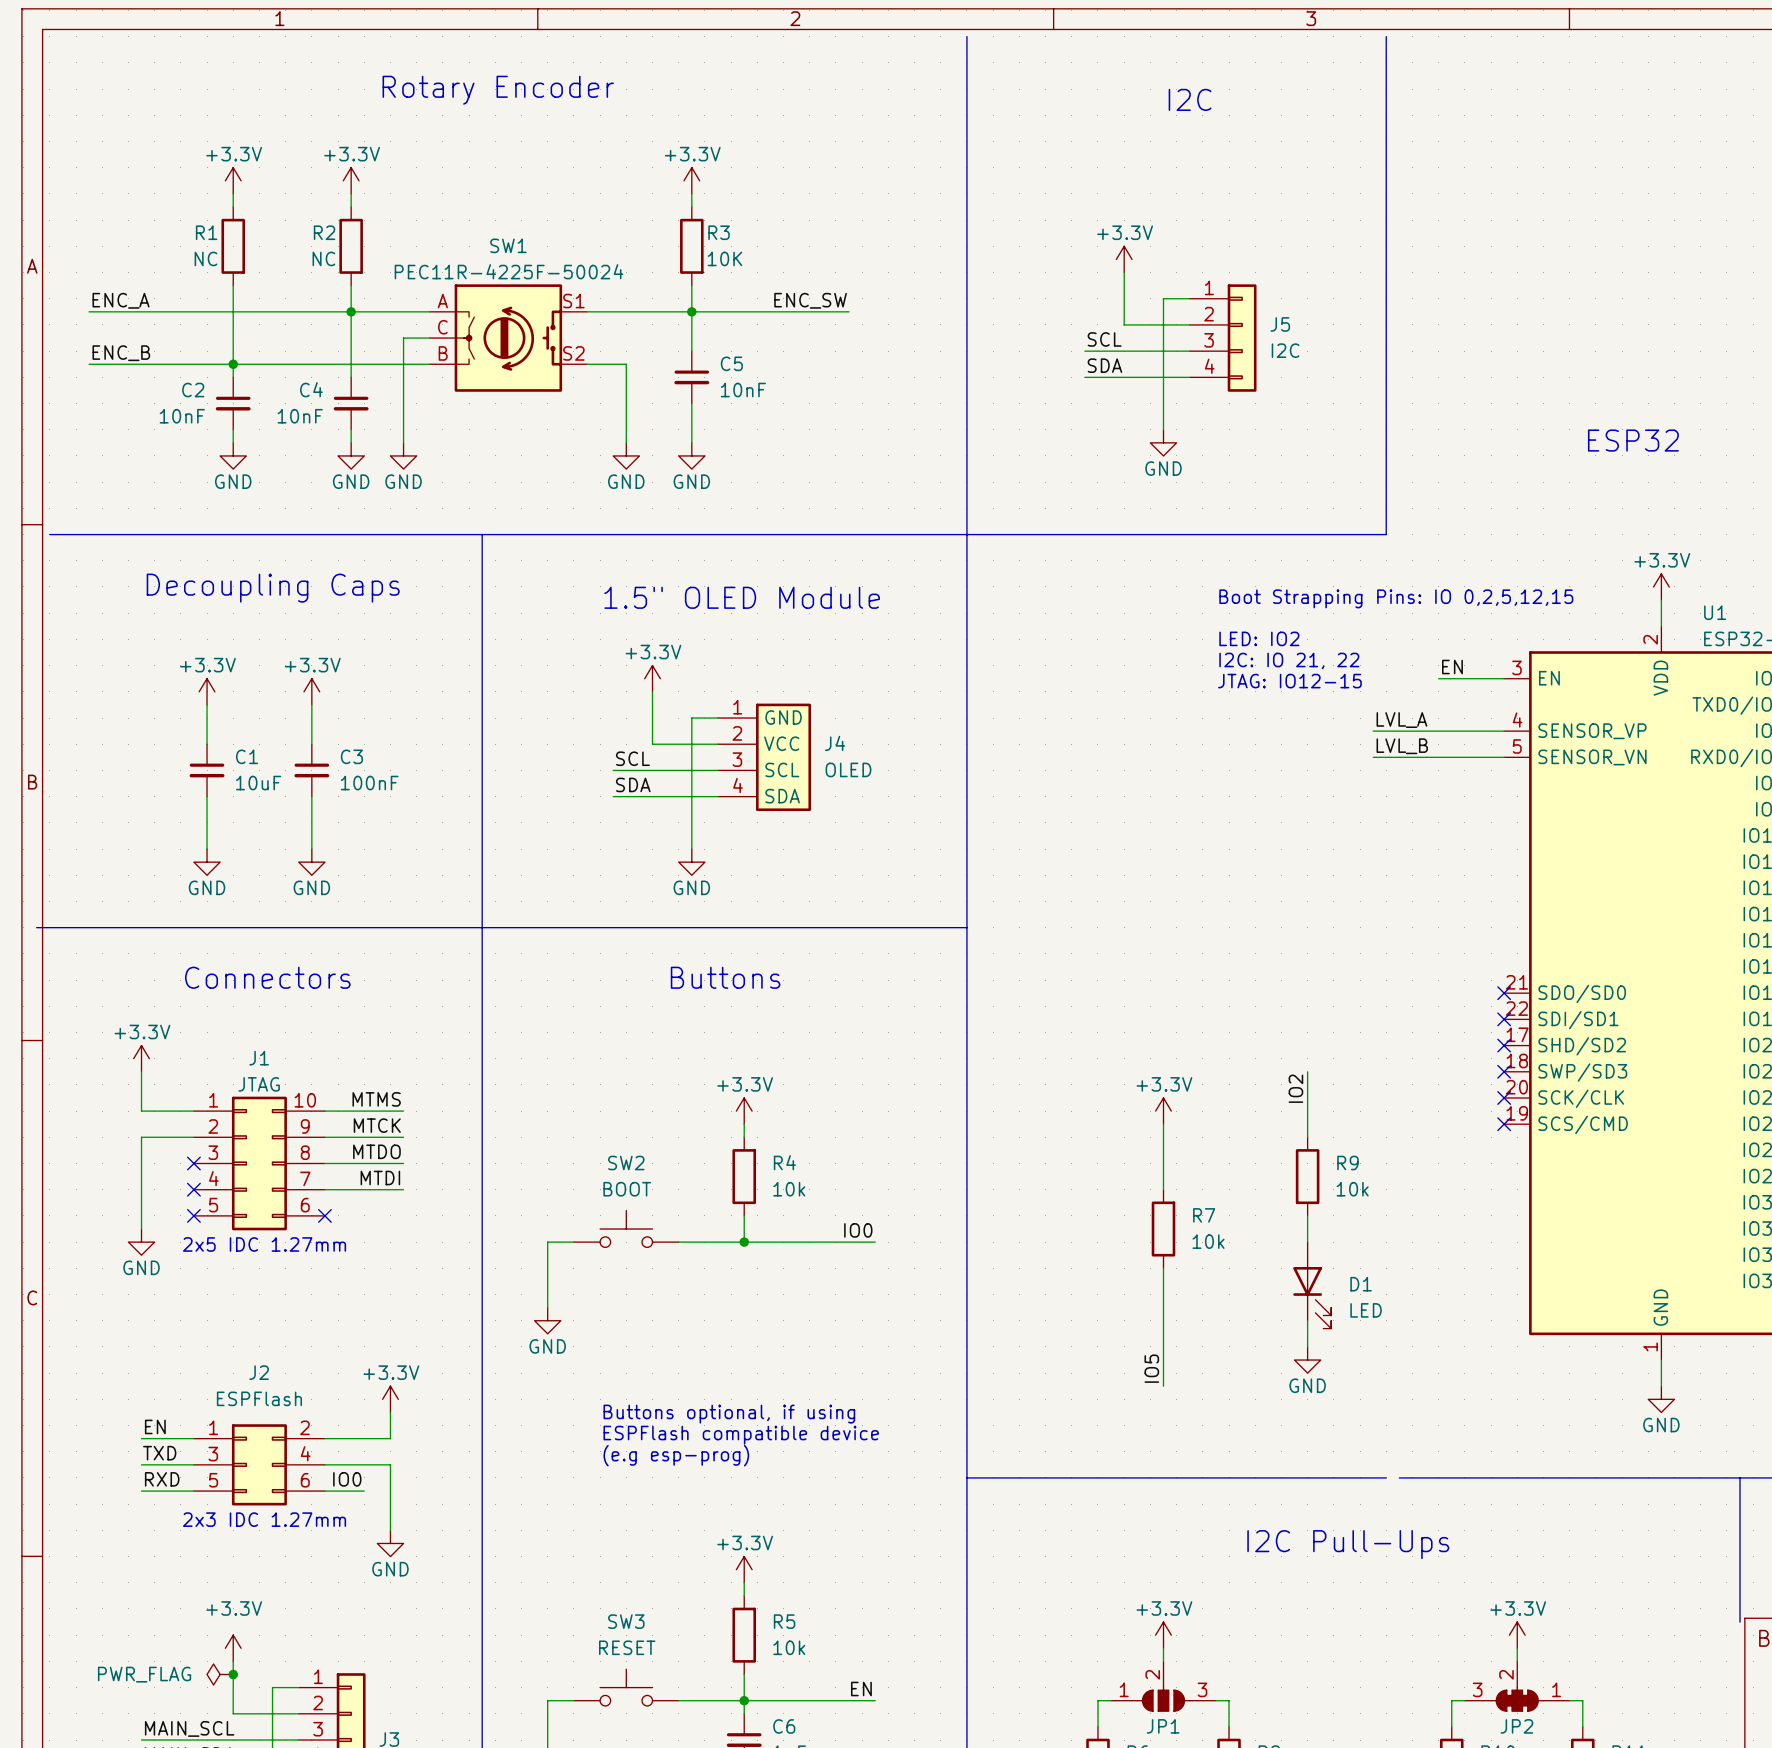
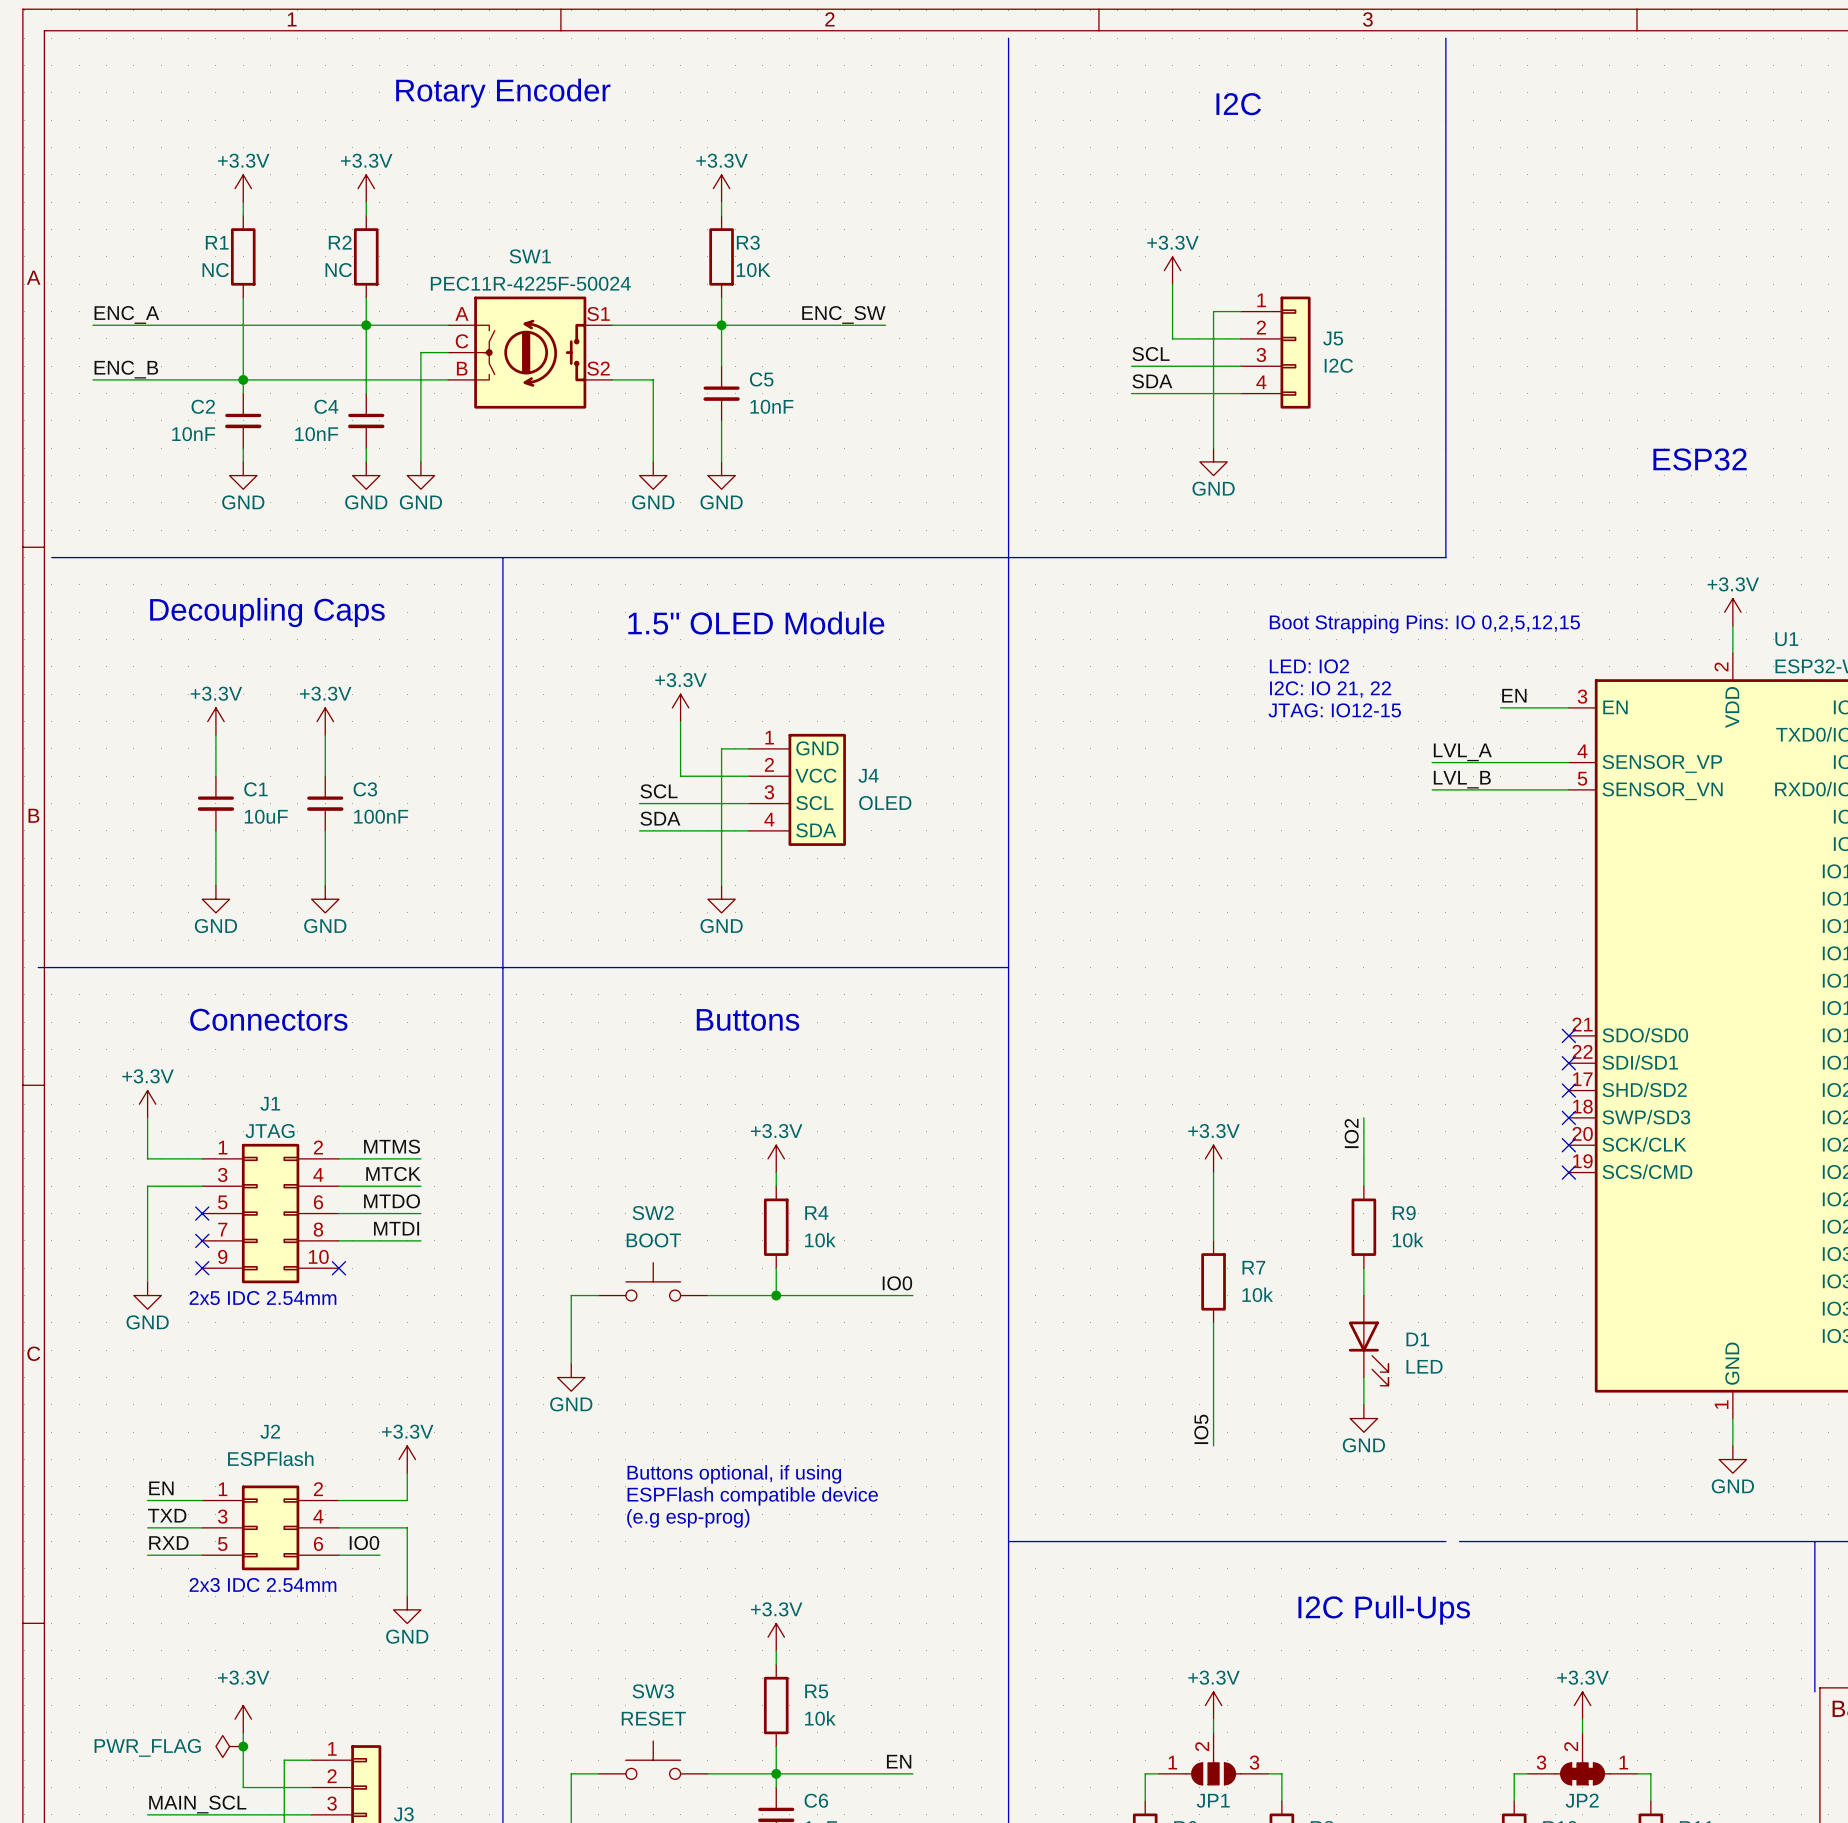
J1 symbol: [193, 1096, 325, 1231] -> [202, 1143, 339, 1284]
text: 2x5 IDC 1.27mm (264, 1244) -> 2x5 IDC 2.54mm (262, 1298)
text: 2x3 IDC 1.27mm (264, 1519) -> 2x3 IDC 2.54mm (262, 1585)

